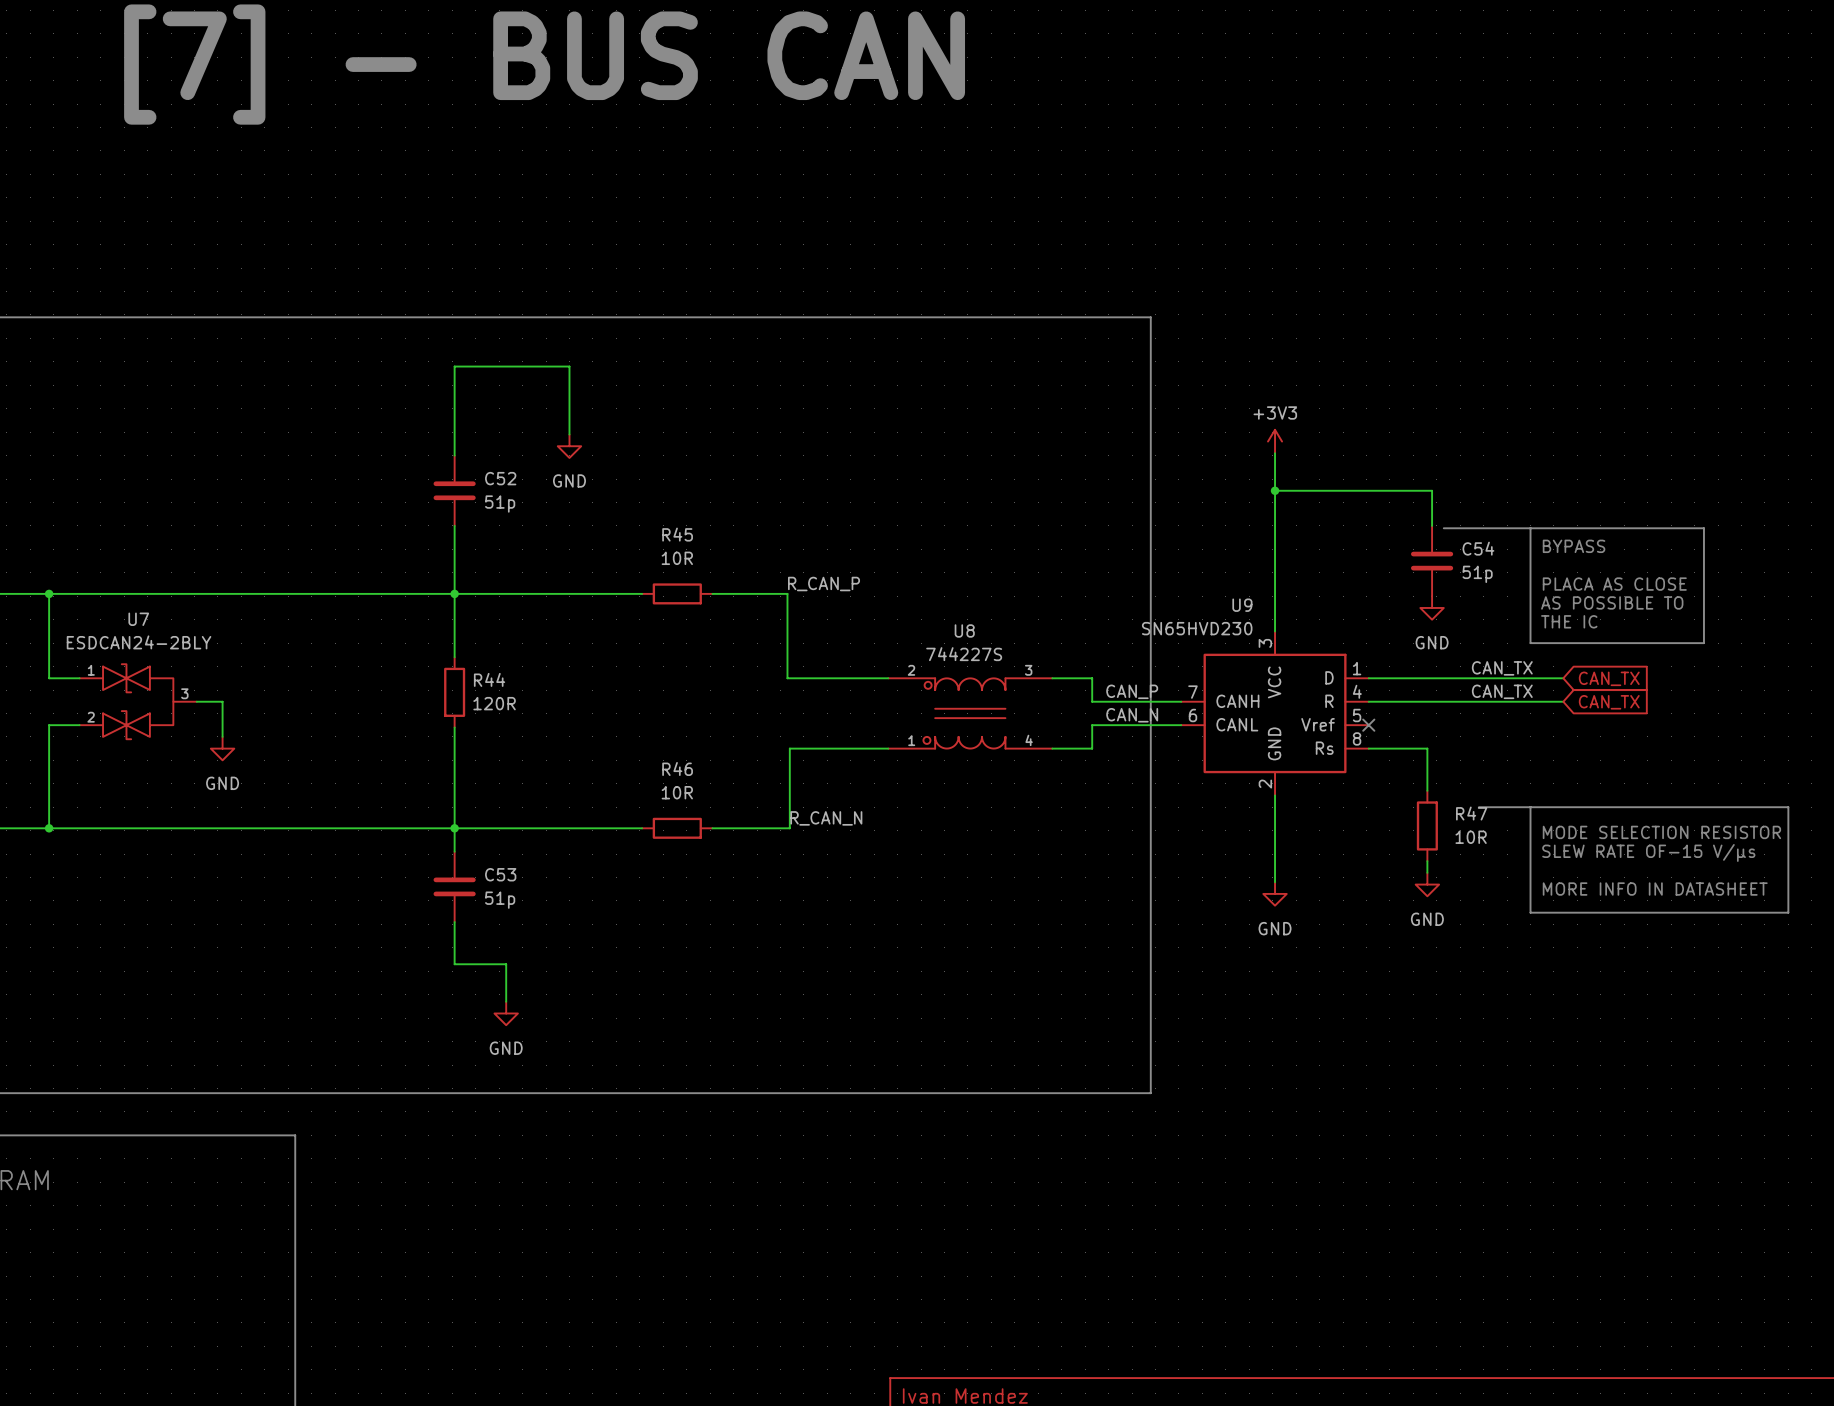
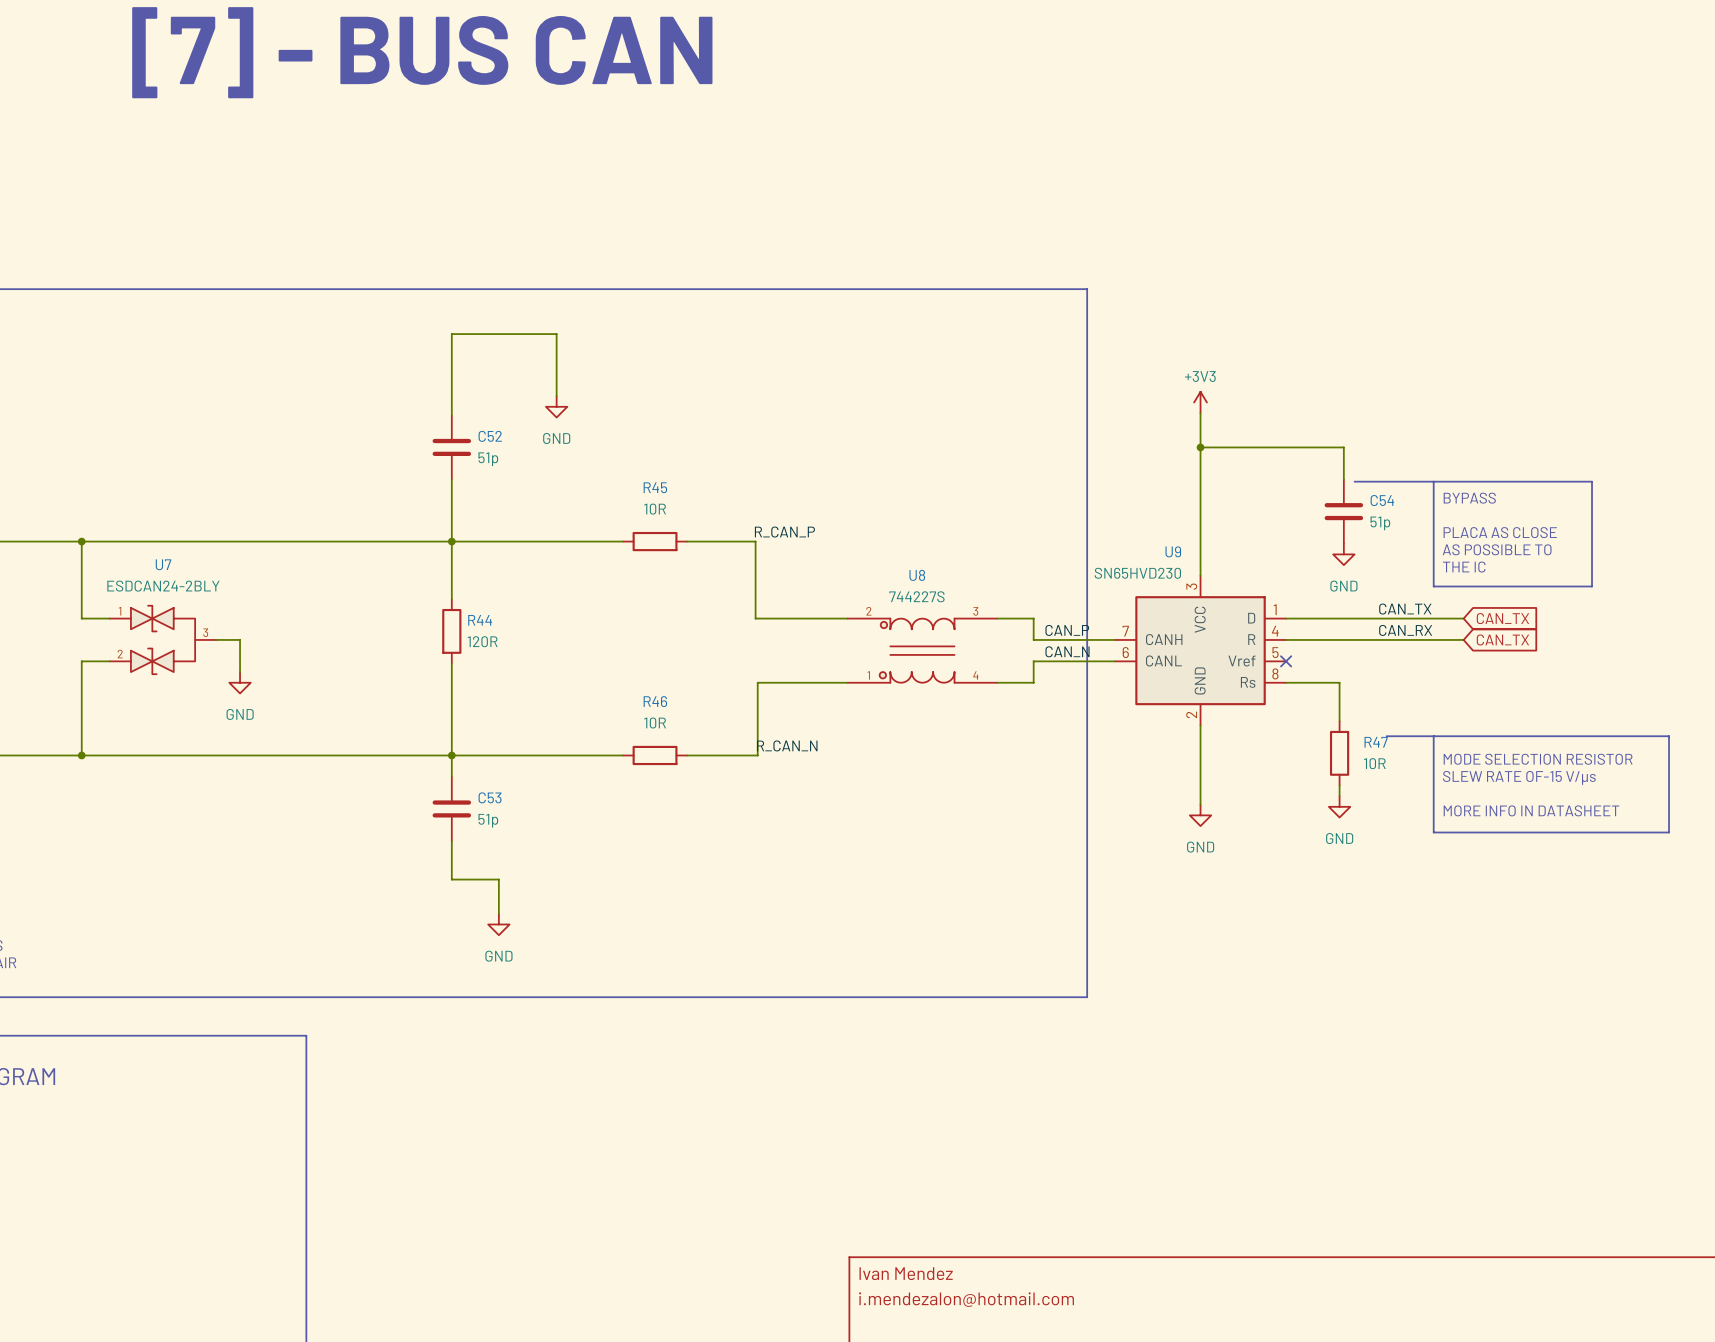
label: CAN_TX (1502, 691) -> CAN_RX (1405, 630)

